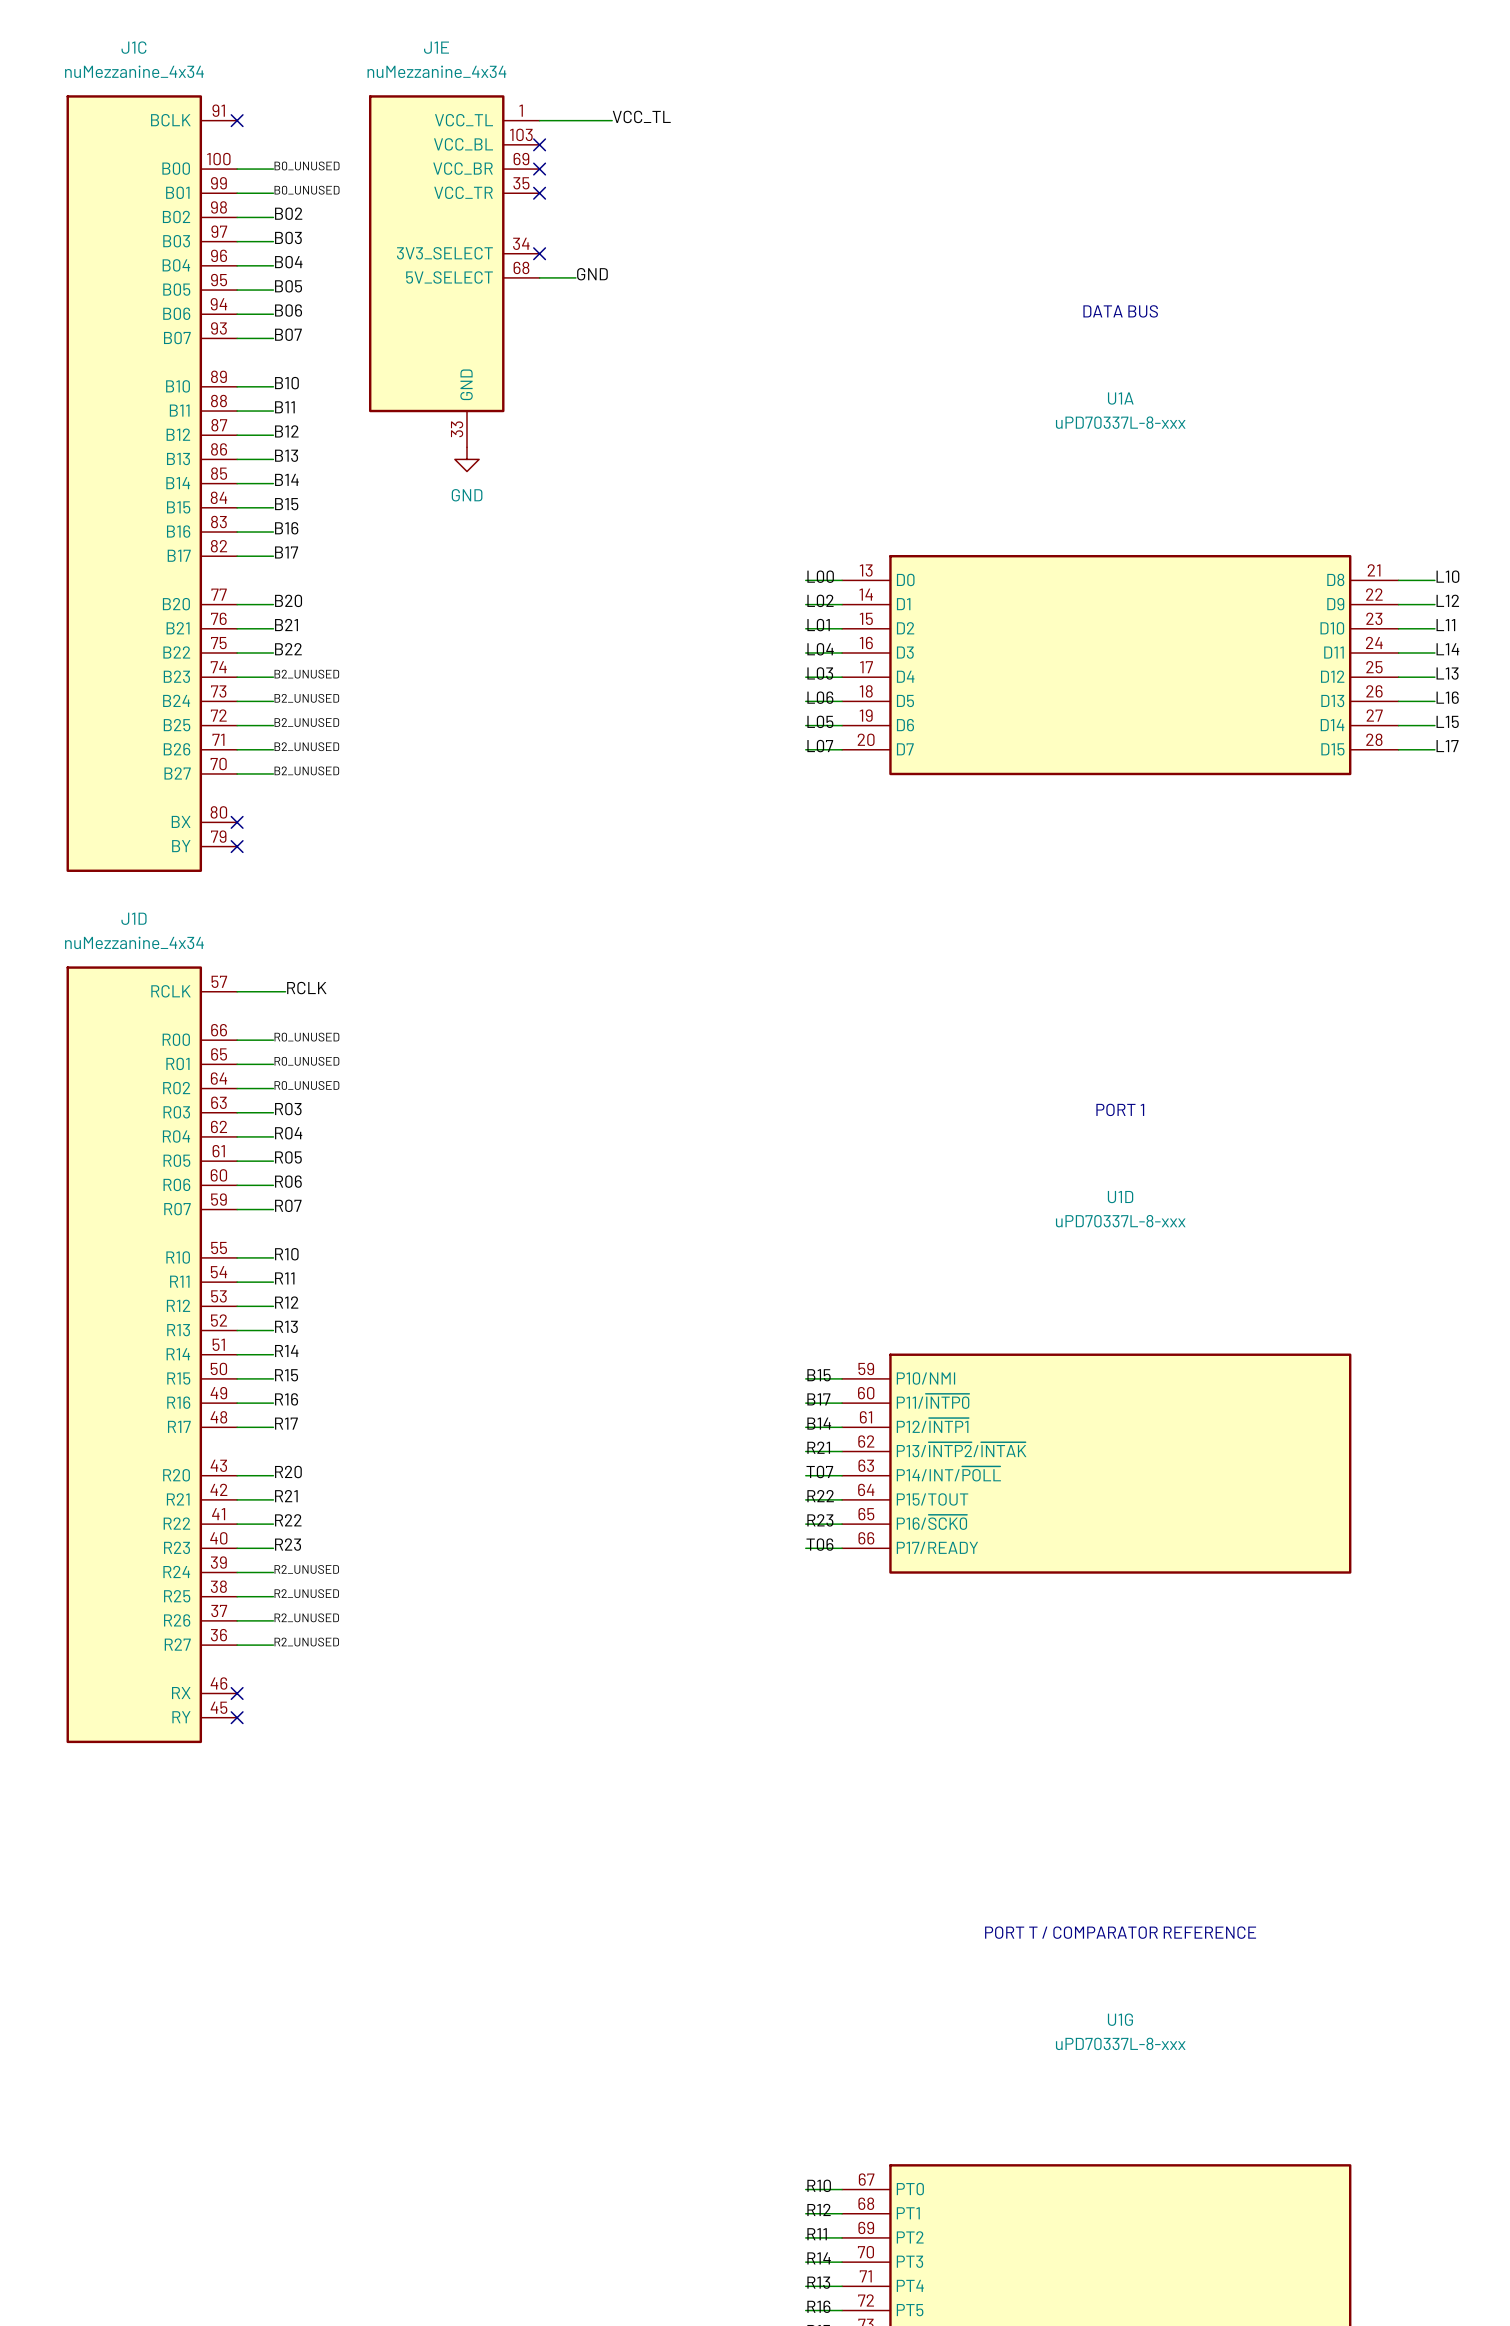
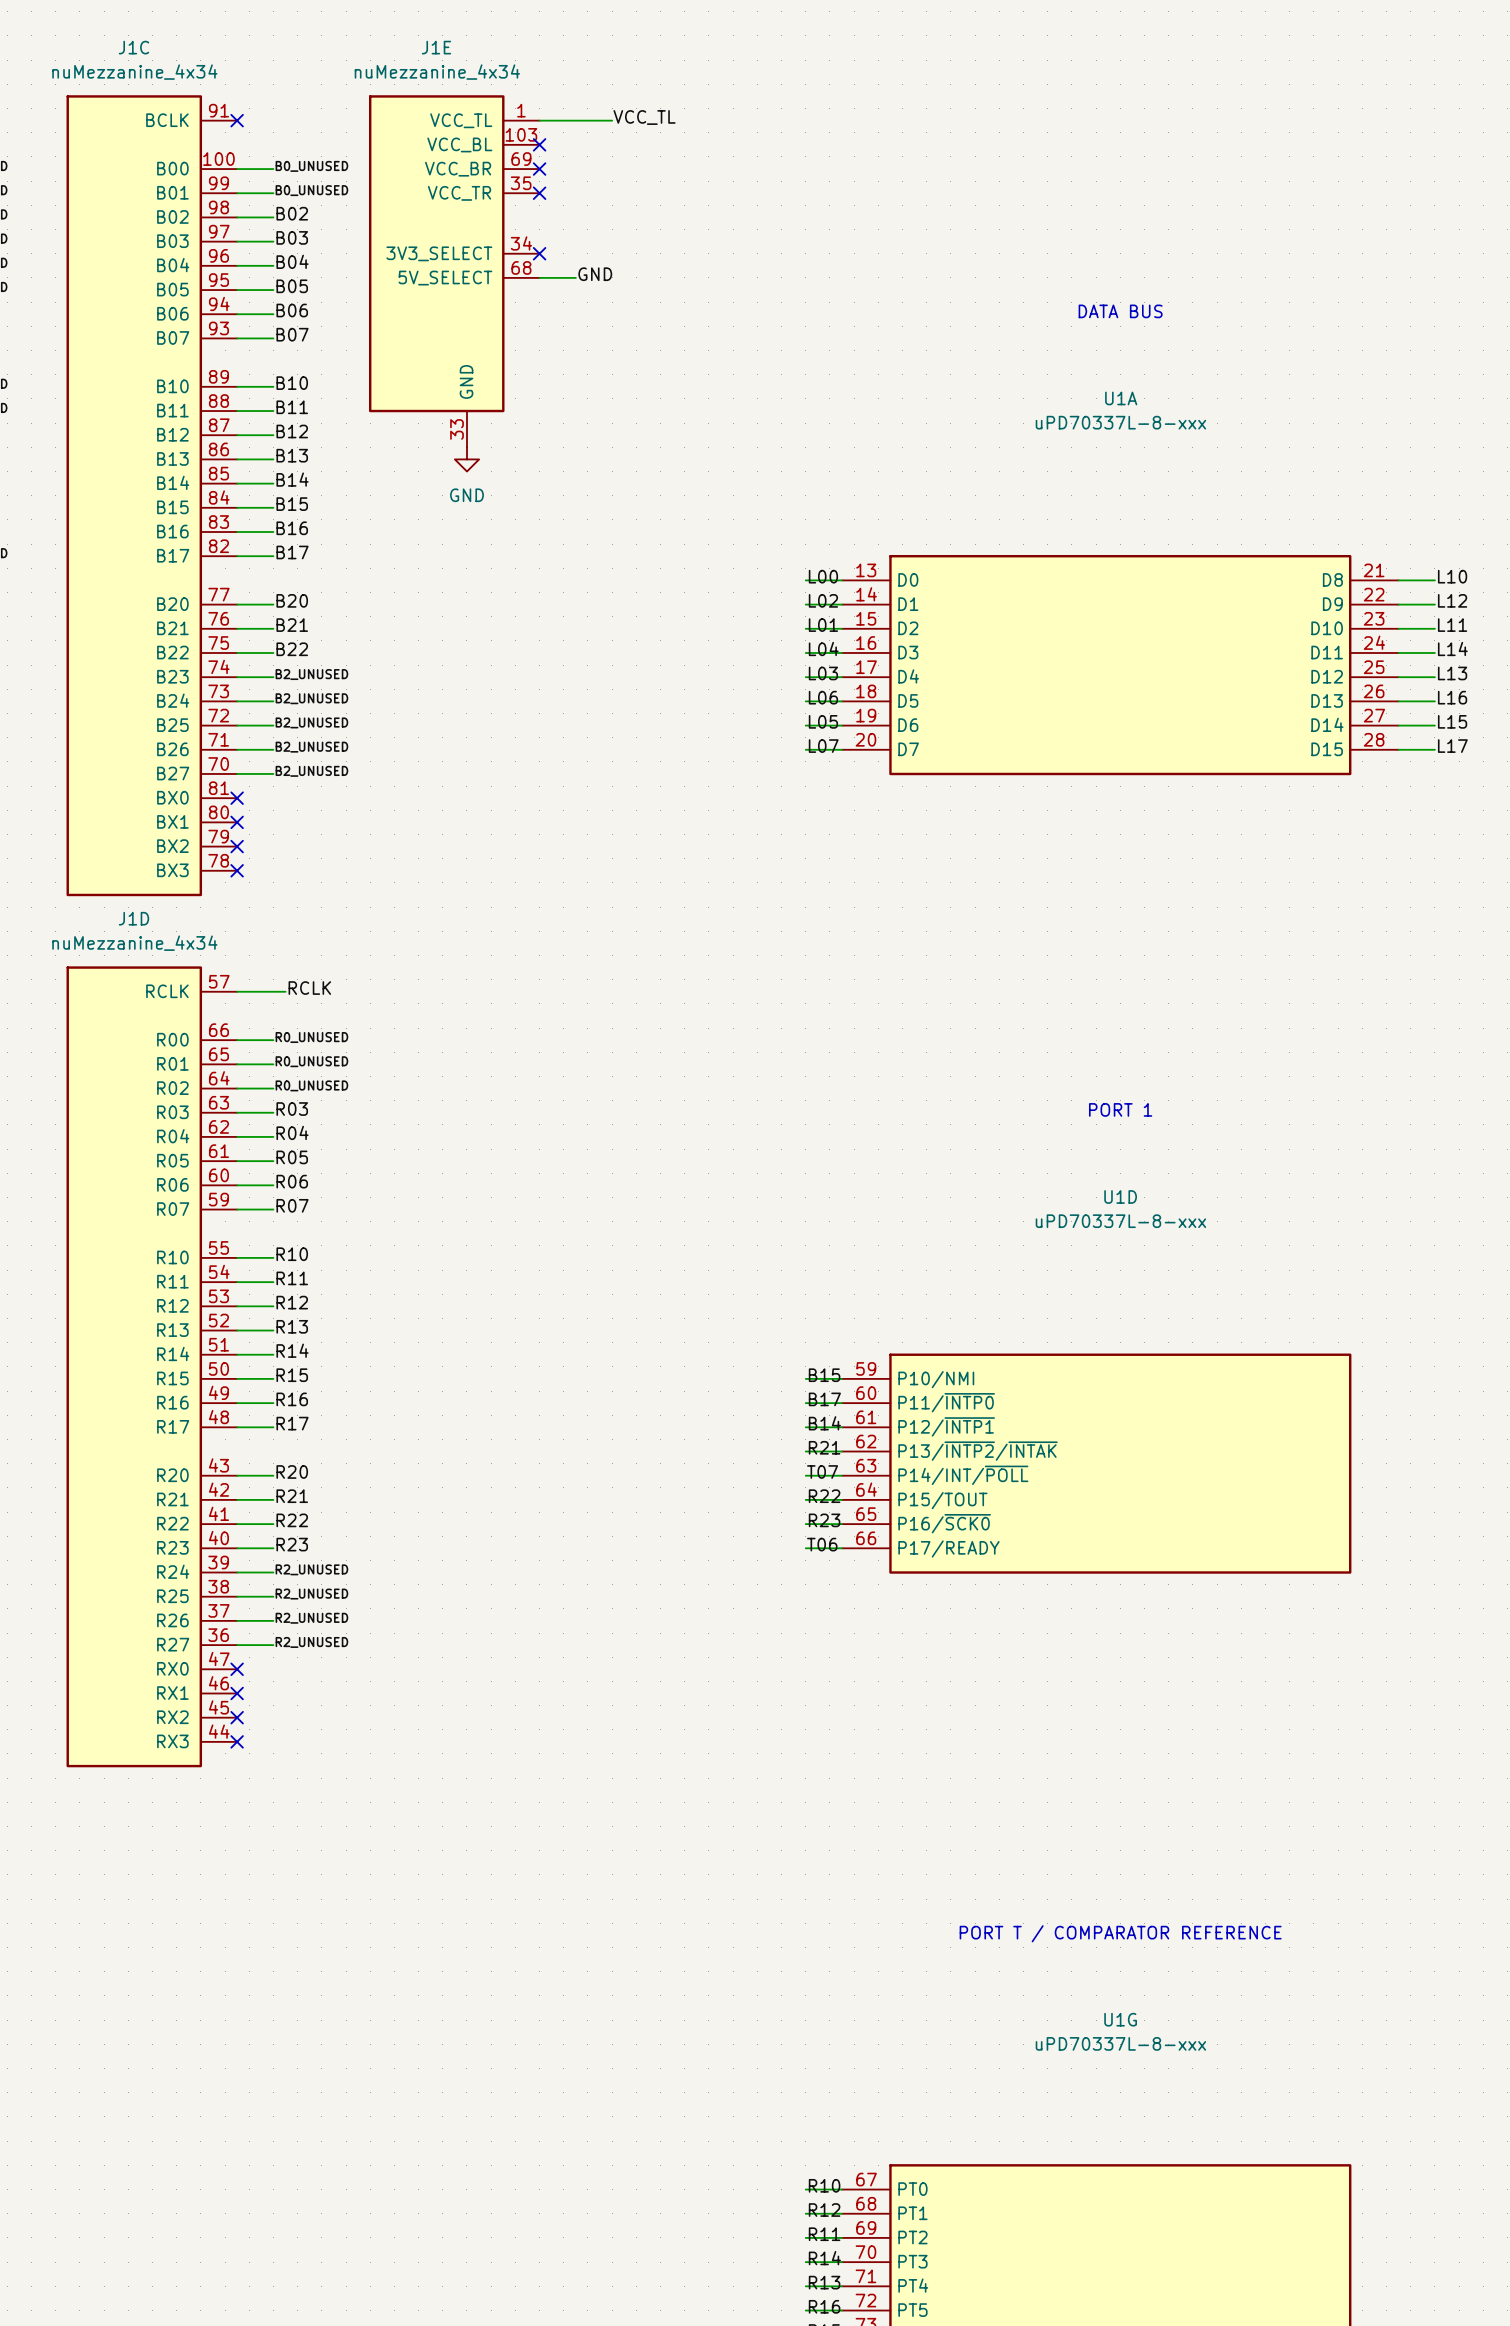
J1C symbol: [66, 95, 238, 872] -> [66, 95, 238, 897]
no-connect mark: none -> (237, 798)
no-connect mark: none -> (237, 870)
J1D symbol: [66, 966, 238, 1744] -> [66, 966, 238, 1768]
no-connect mark: none -> (237, 1669)
no-connect mark: none -> (237, 1741)

